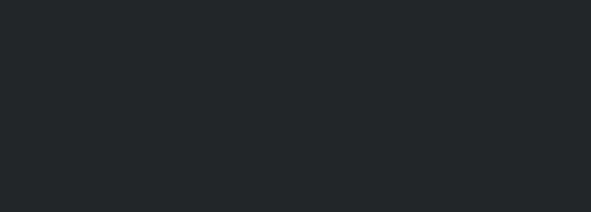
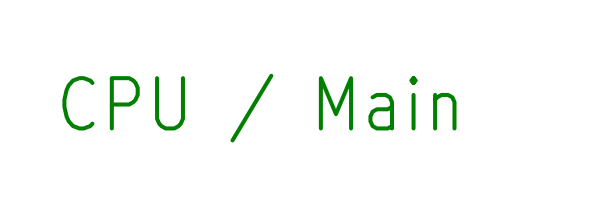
text: none -> CPU / Main (259, 108)

